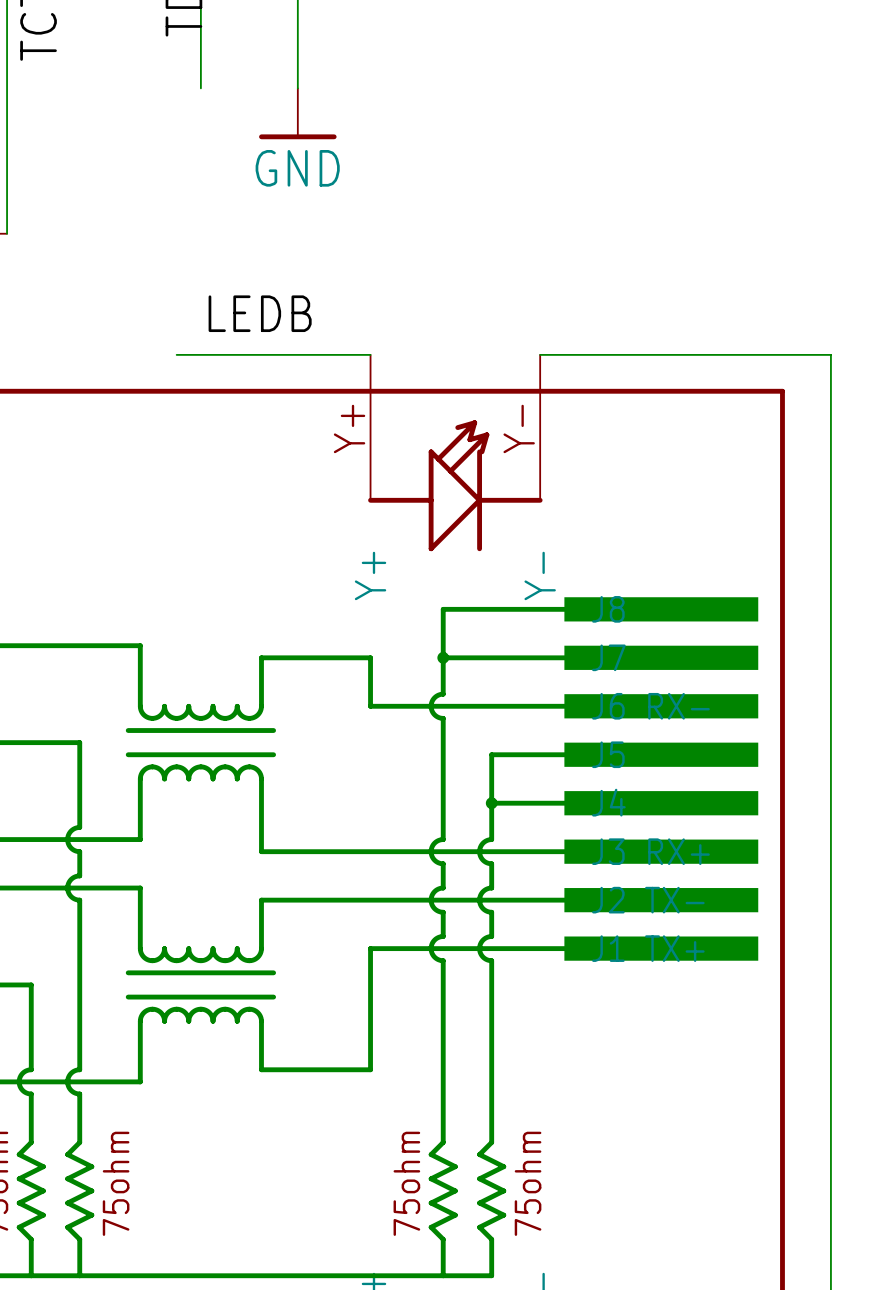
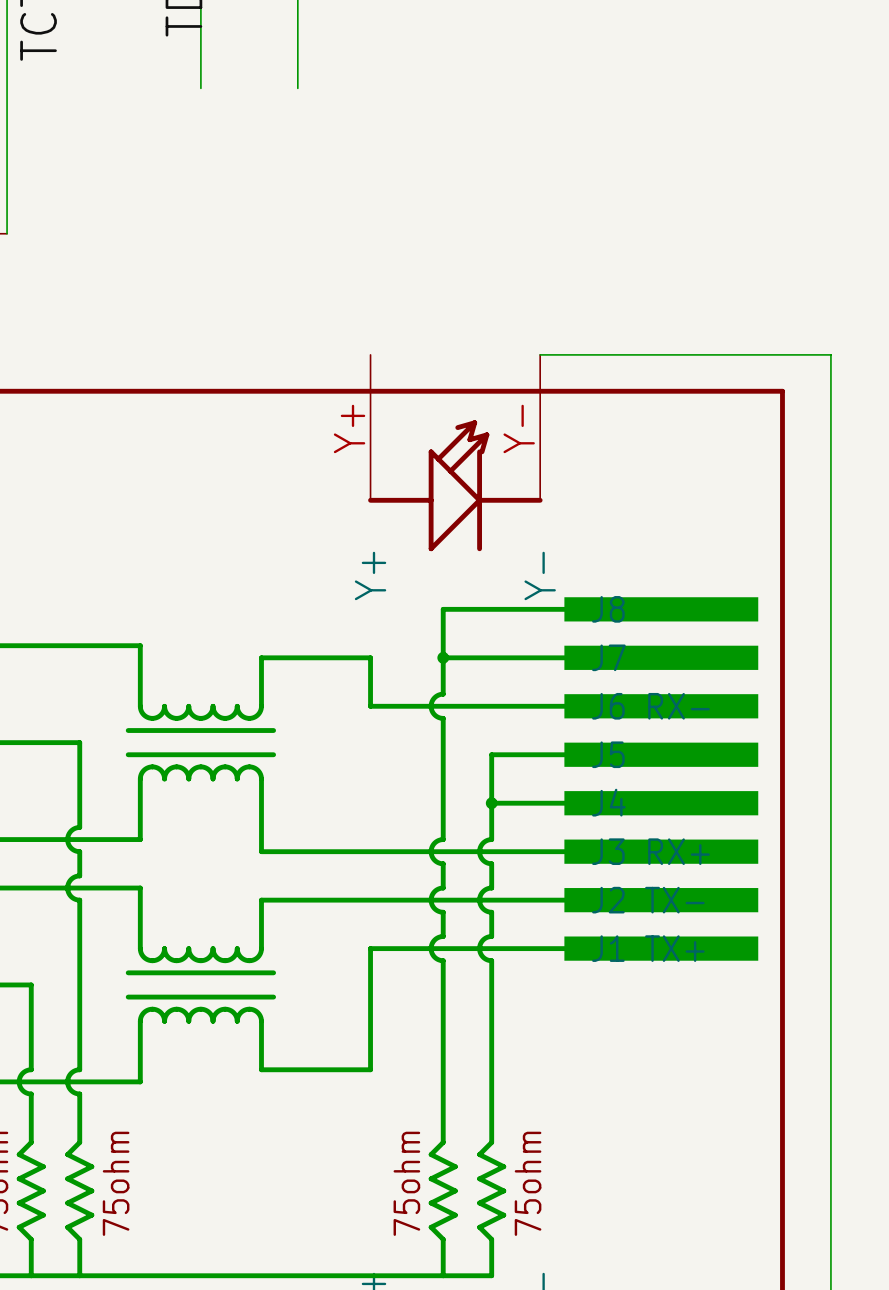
power symbol: GND (297, 113) -> none
label: LEDB (260, 313) -> none
wire: (176, 354) (370, 354) -> none

